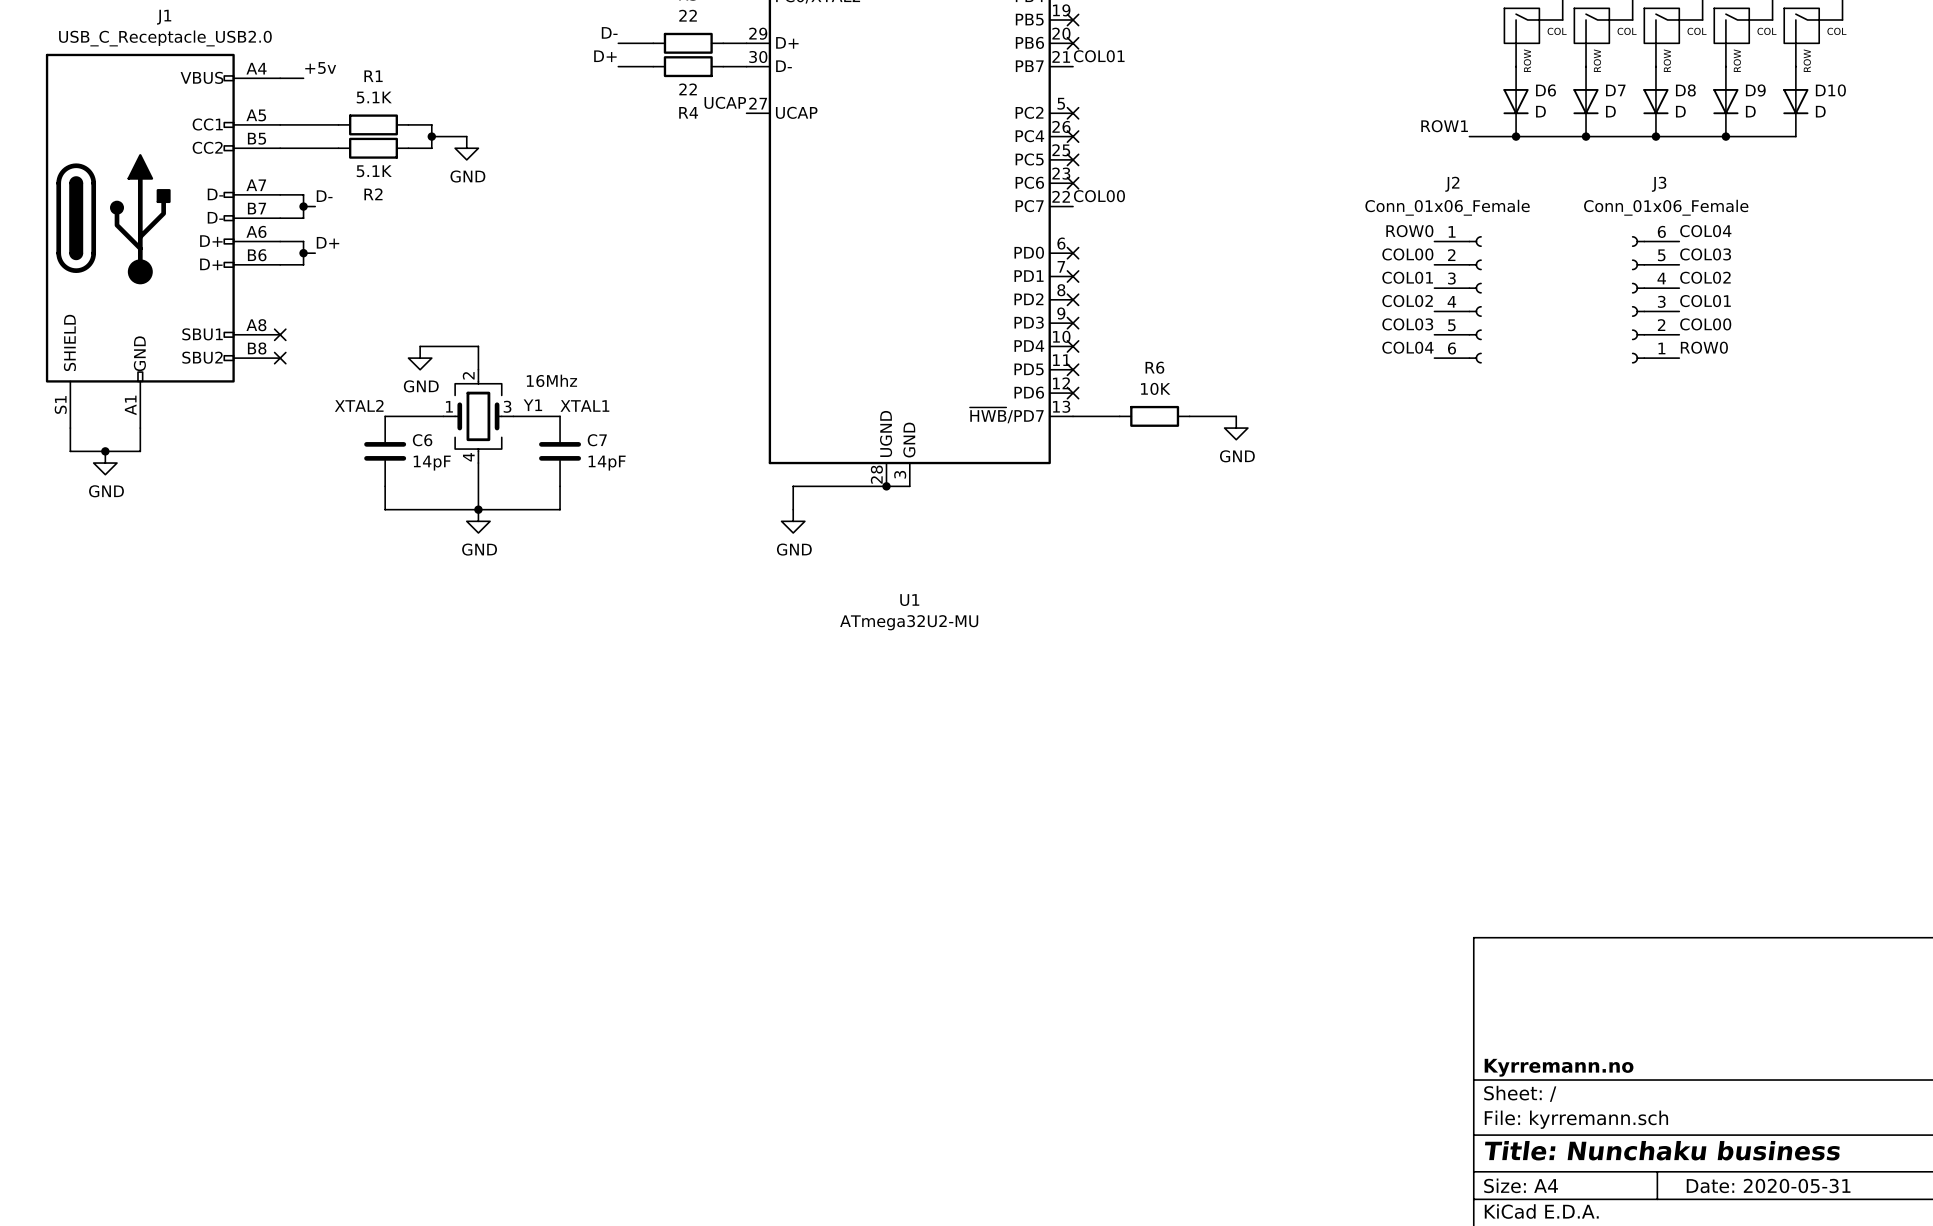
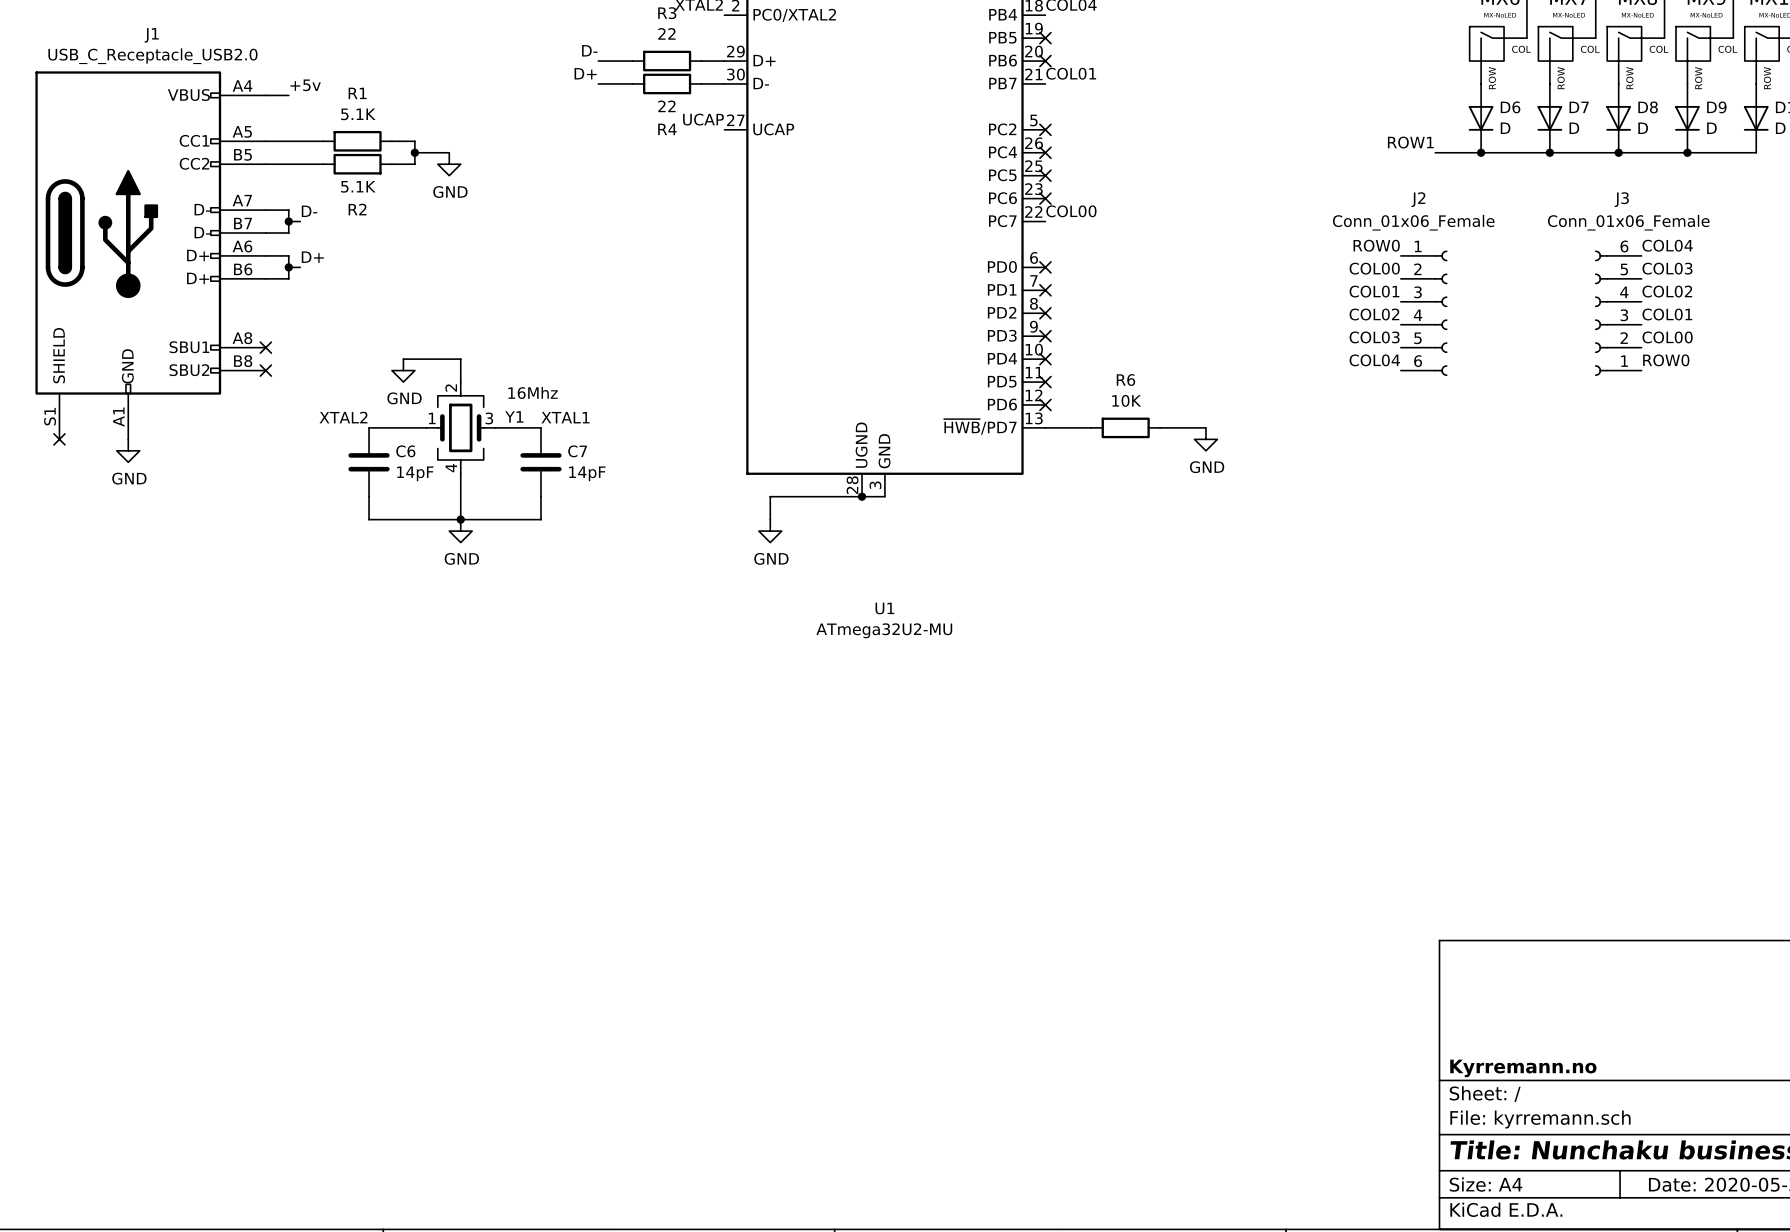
wire: (70, 428) (70, 451) (140, 451) (140, 428) -> none
no-connect mark: none -> (59, 439)
junction: (105, 451) -> none
power symbol position: GND (105, 463) -> GND (128, 450)

